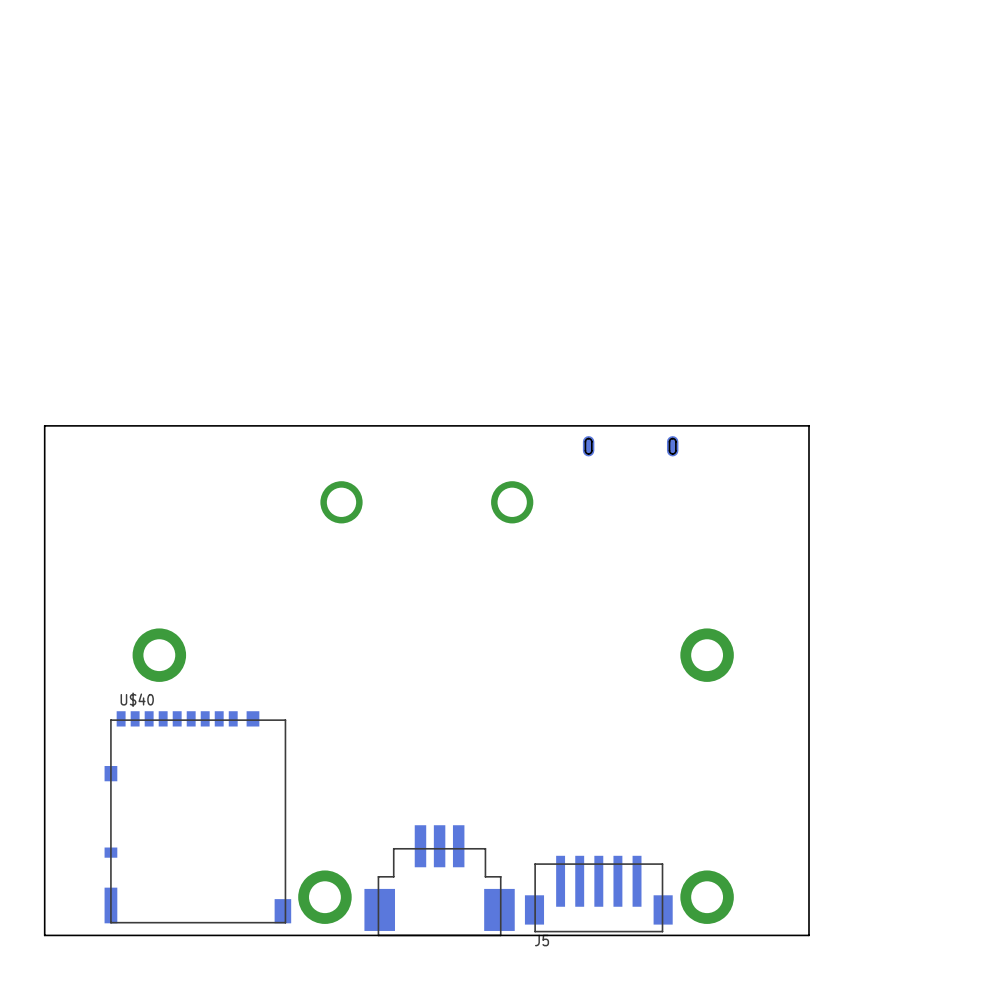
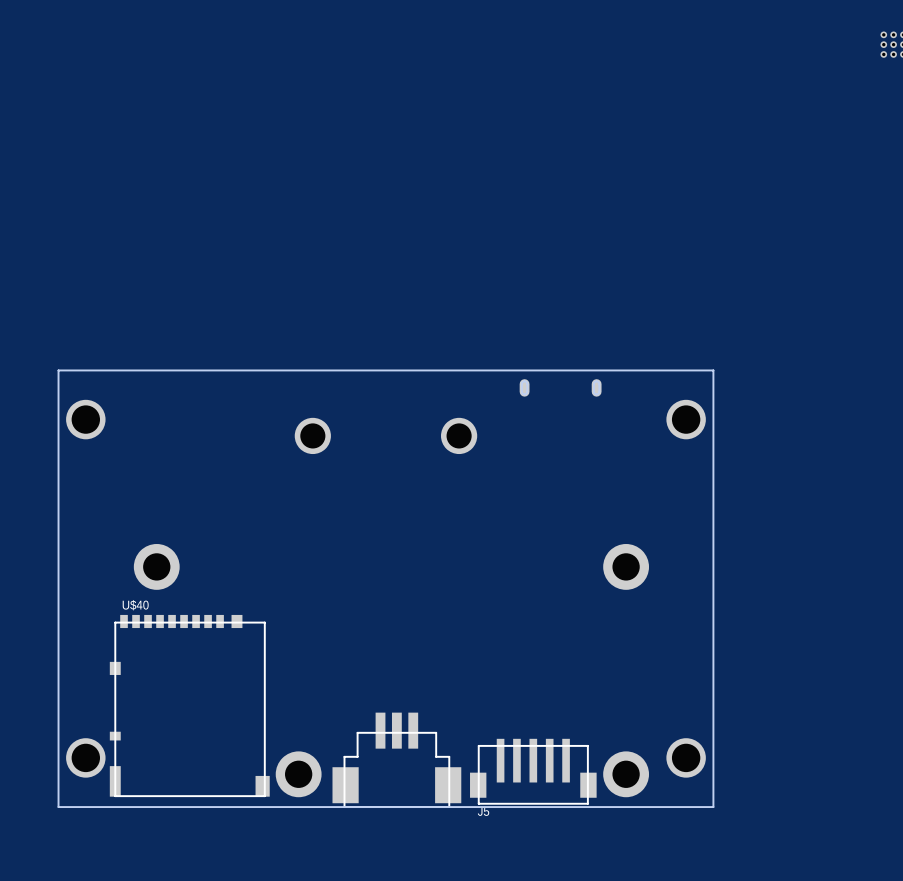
part: none -> (85, 419)
part: none -> (686, 419)
part: none -> (85, 757)
part: none -> (686, 757)

